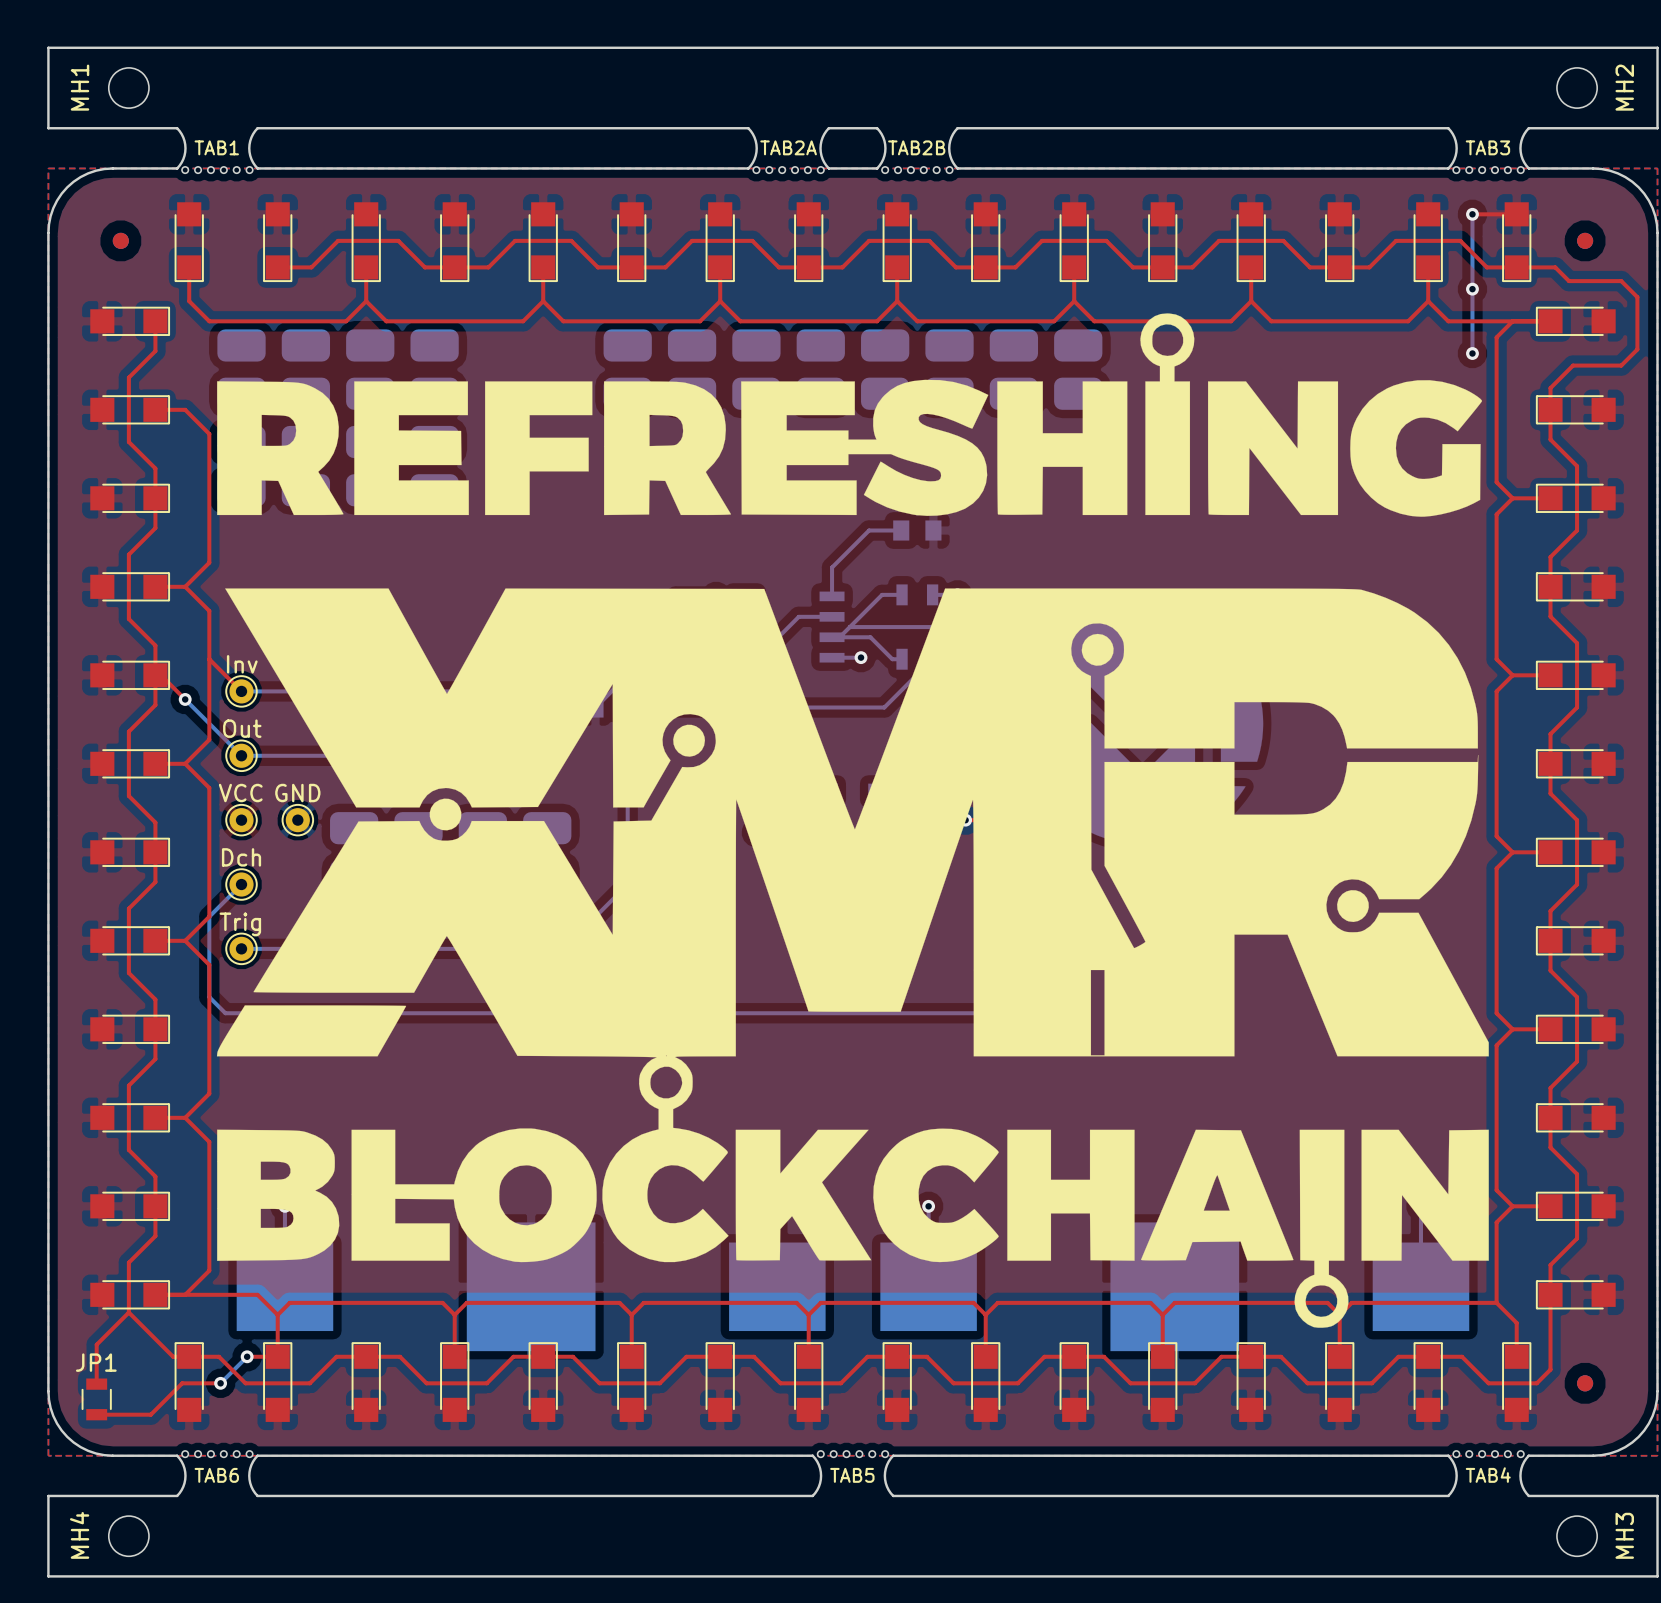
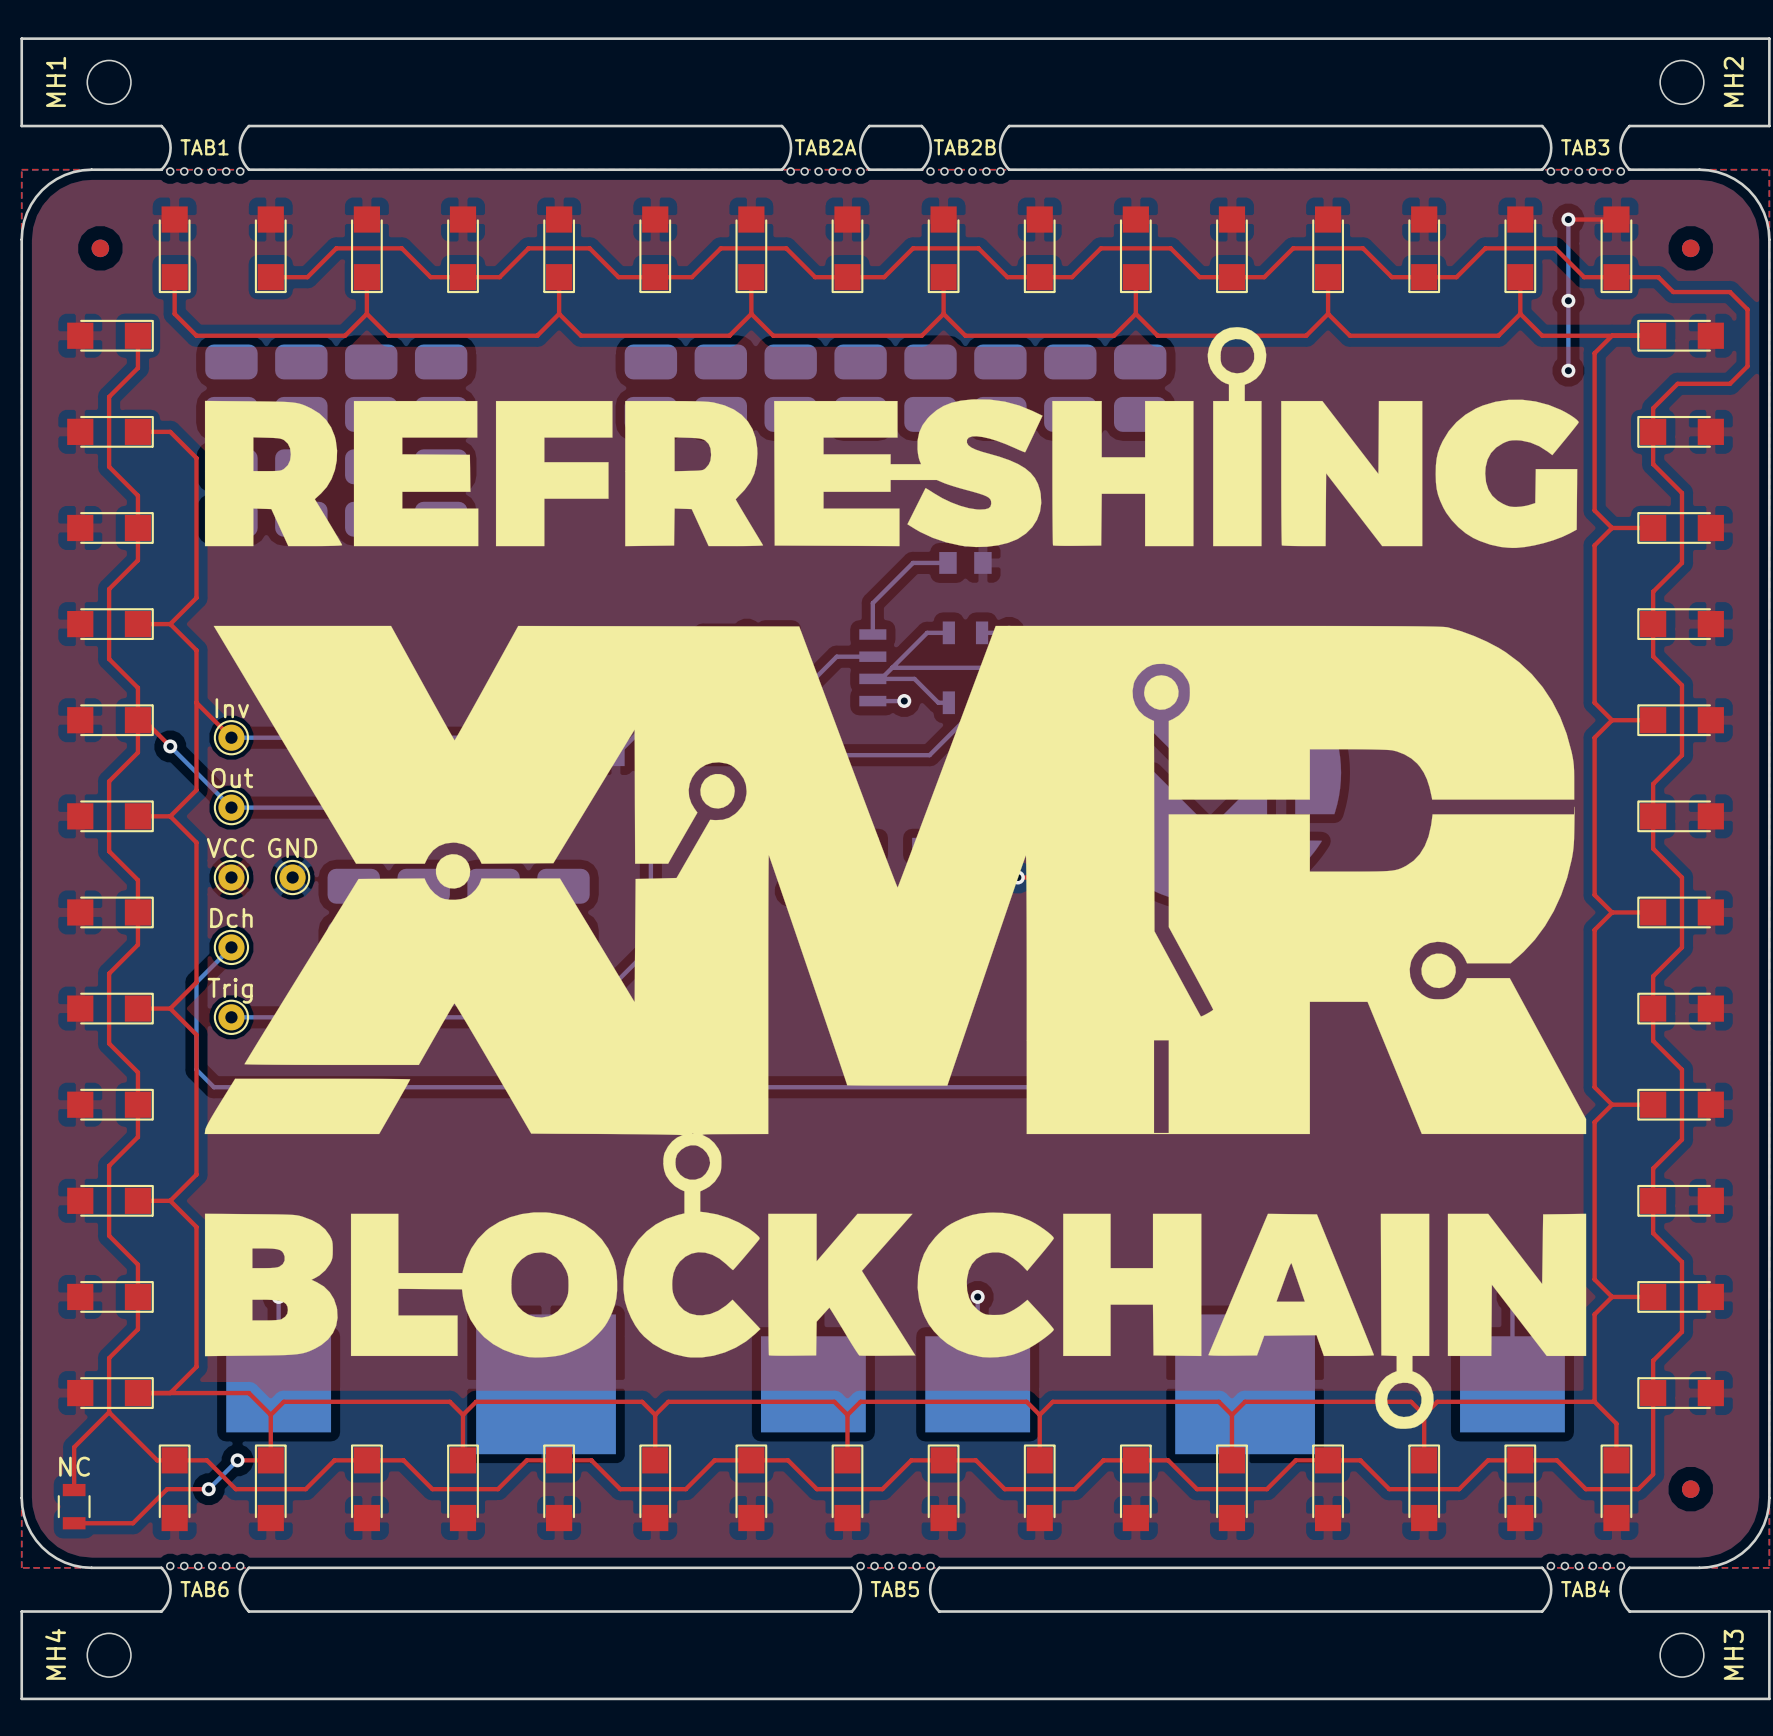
JP1 name: JP1 (96, 1362) -> NC (74, 1466)

